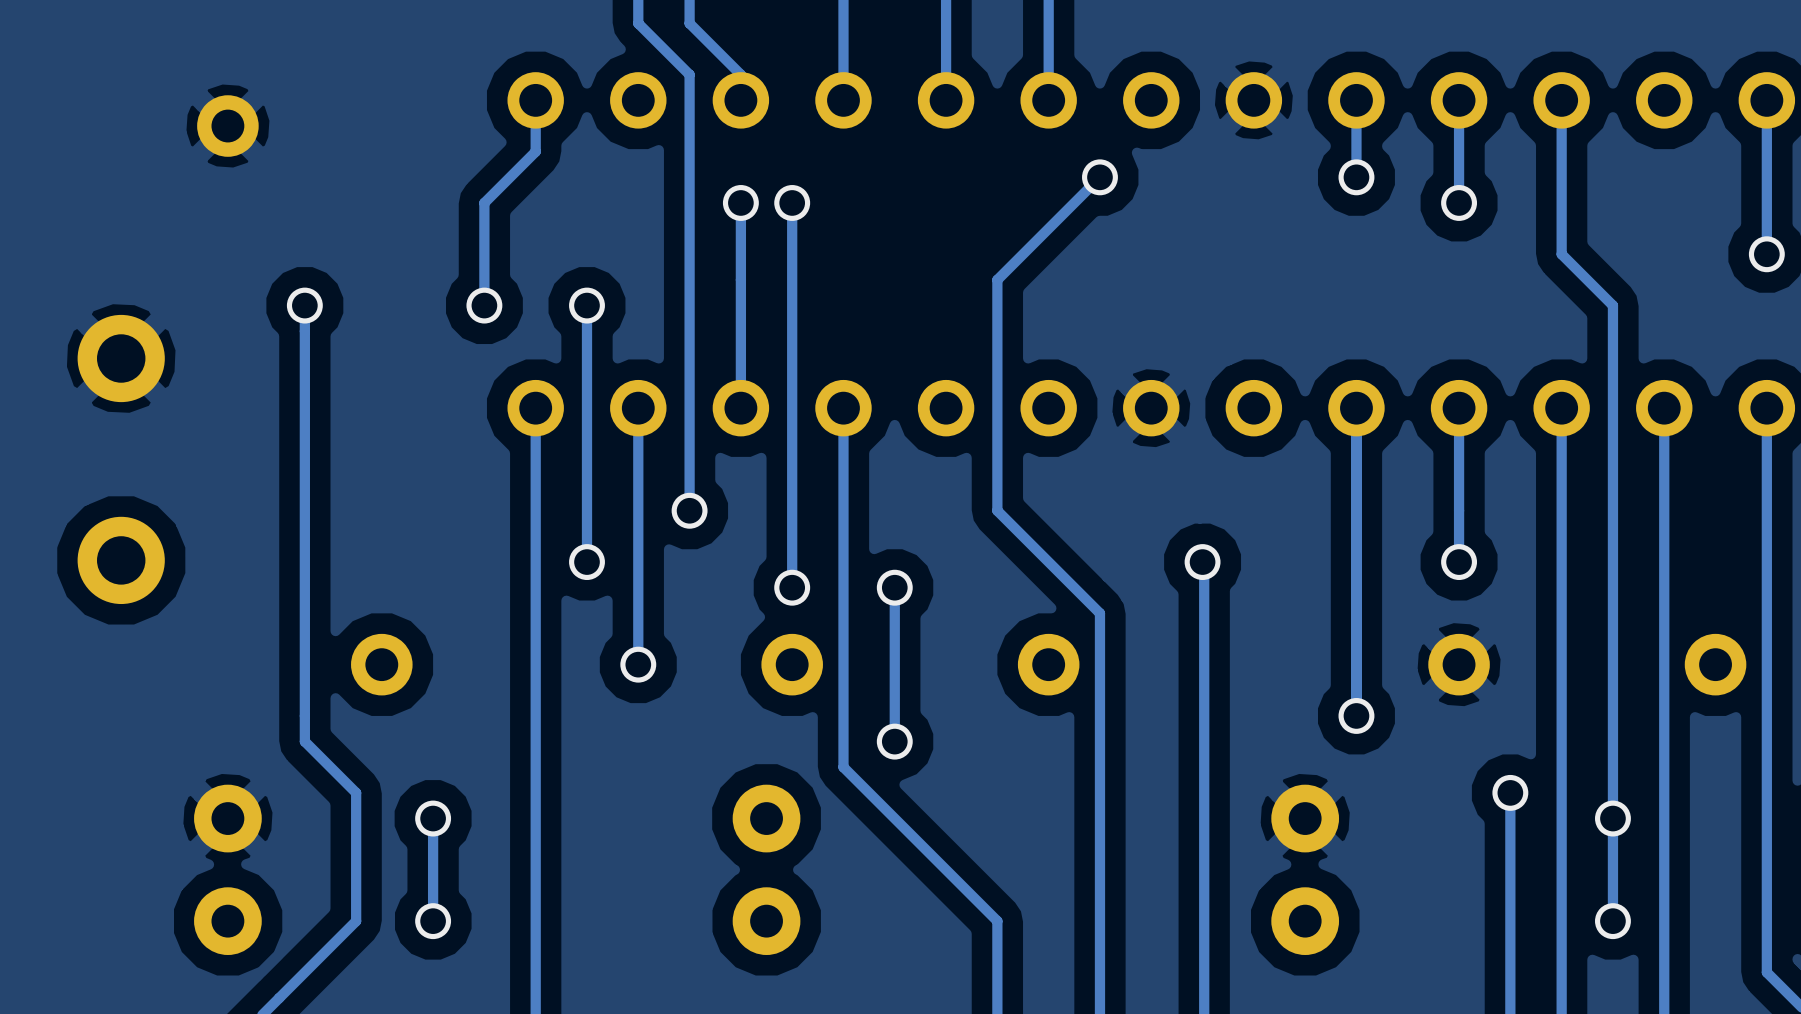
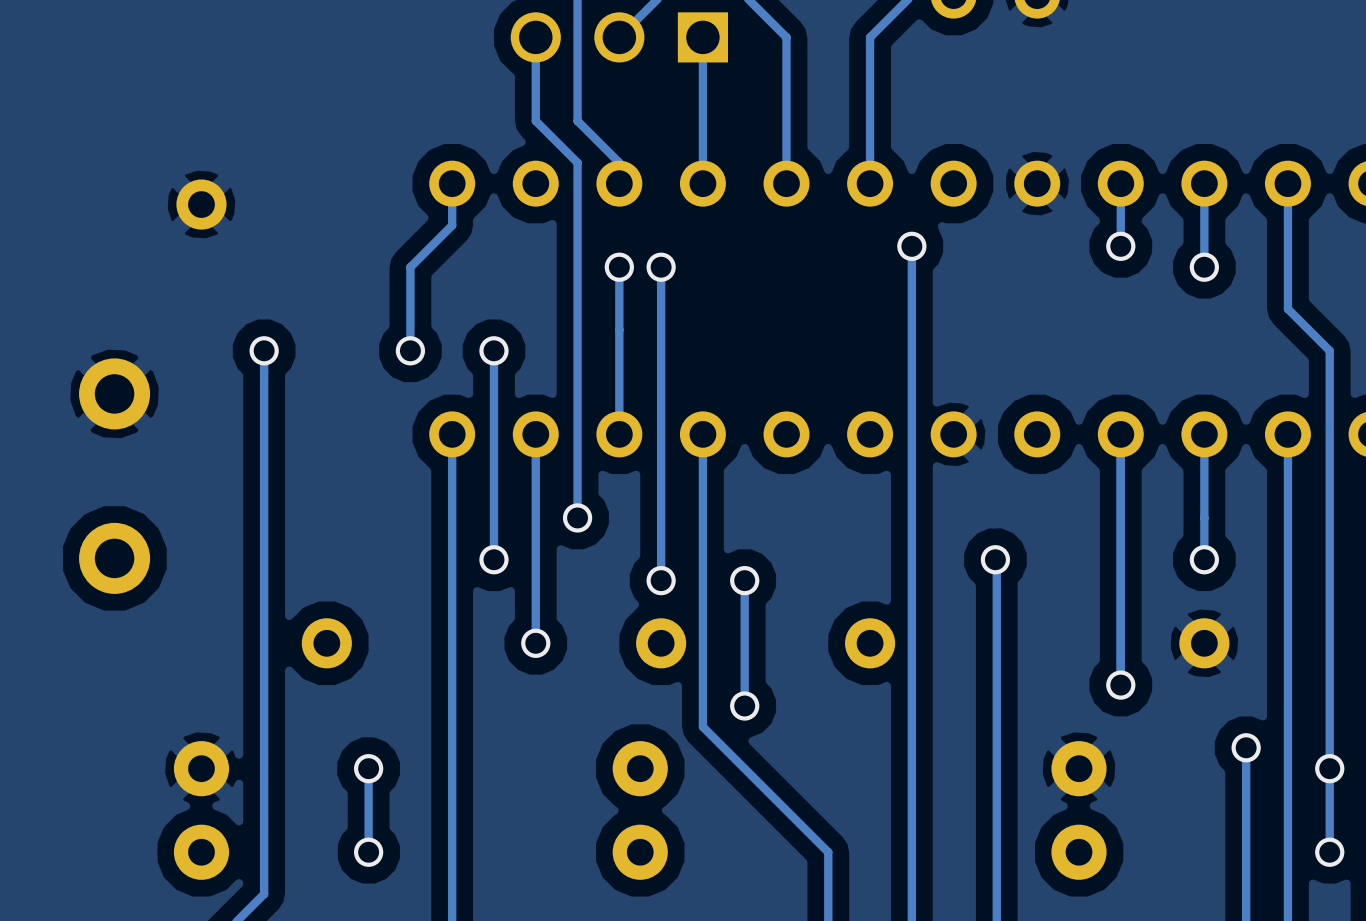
track: (1099, 177) (997, 279) (997, 510) (1099, 613) -> (911, 246) (911, 601)
track: (304, 741) (356, 792) (356, 921) (304, 972) -> (264, 705) (264, 894)

